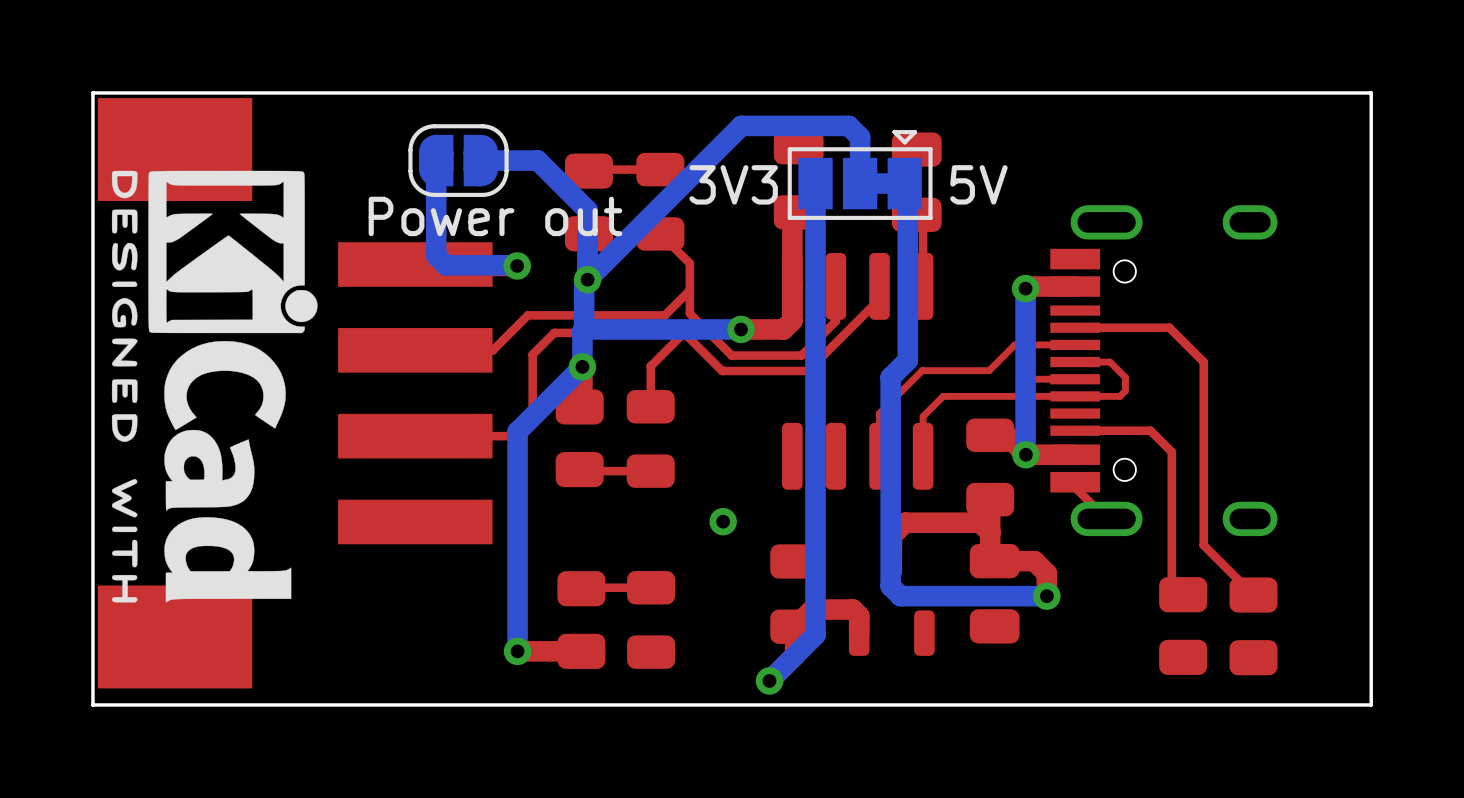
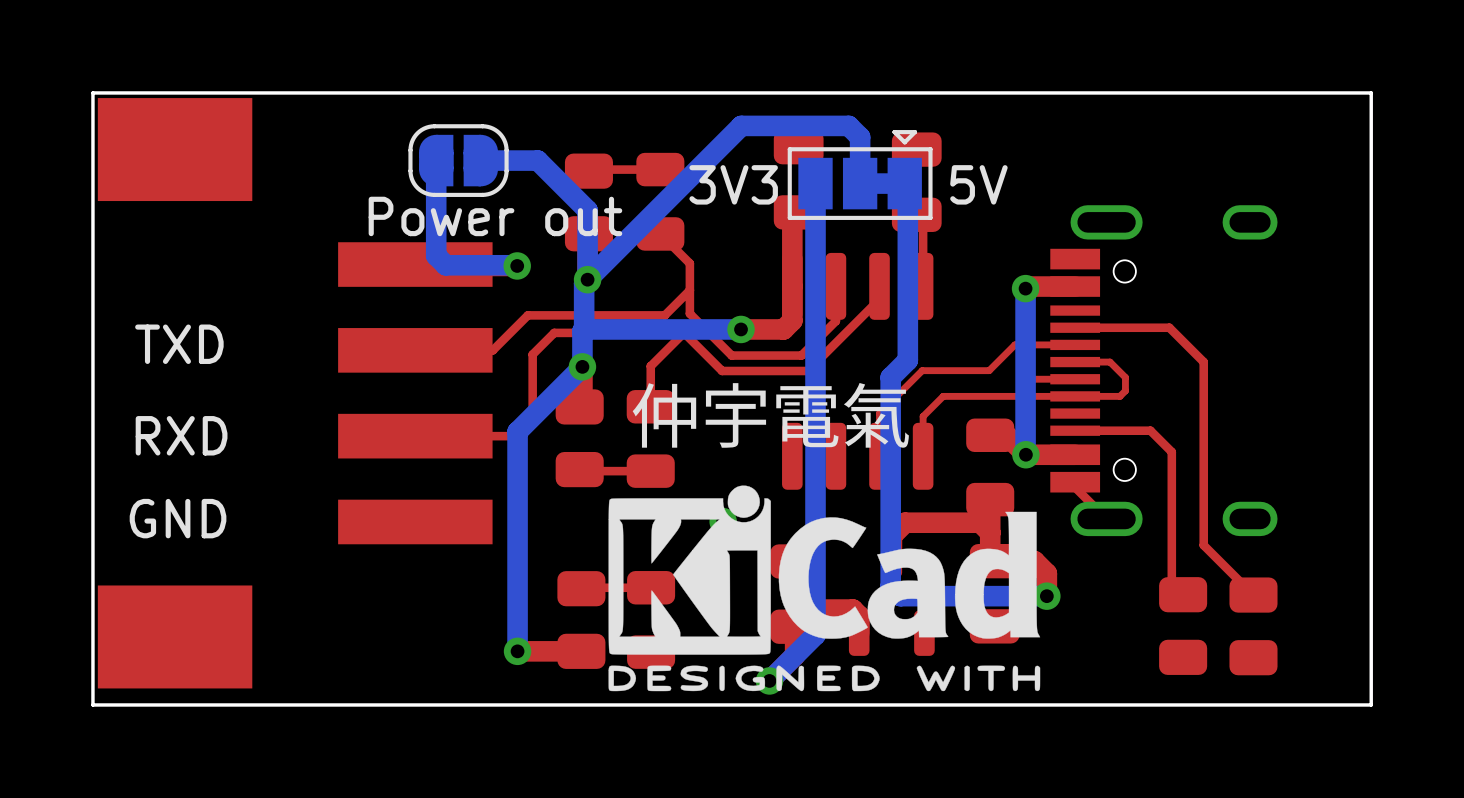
drawing: [111, 170, 318, 603] -> none
text: none -> TXD (179, 344)
text: none -> 仲宇電氣 (770, 415)
text: none -> RXD (181, 435)
drawing: none -> [608, 485, 1041, 692]
text: none -> GND (178, 518)

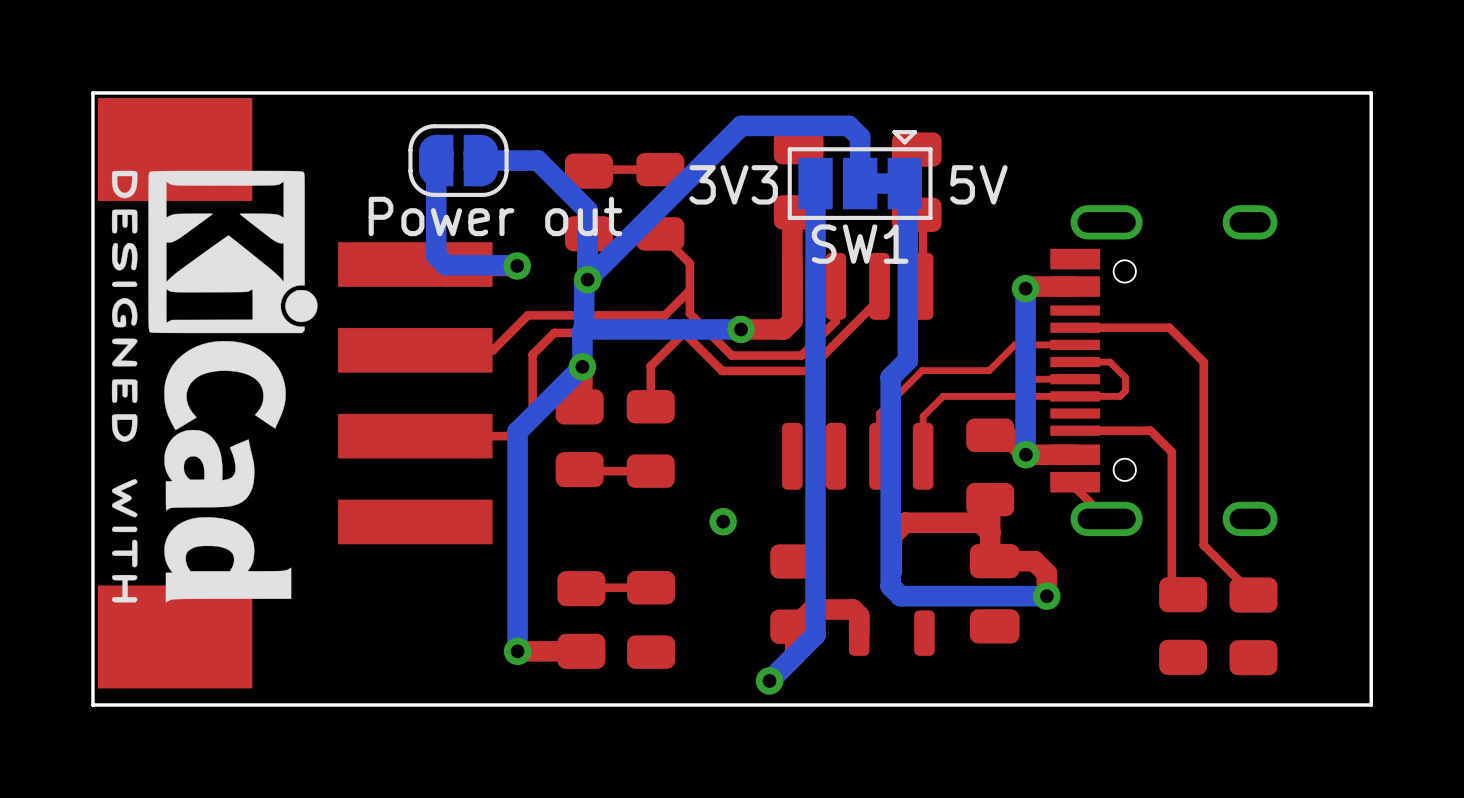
drawing: none -> [111, 170, 318, 603]
SW1 name: none -> SW1 (860, 244)
text: TXD (179, 344) -> none
text: 仲宇電氣 (770, 415) -> none
text: RXD (181, 435) -> none
drawing: [608, 485, 1041, 692] -> none
text: GND (178, 518) -> none

